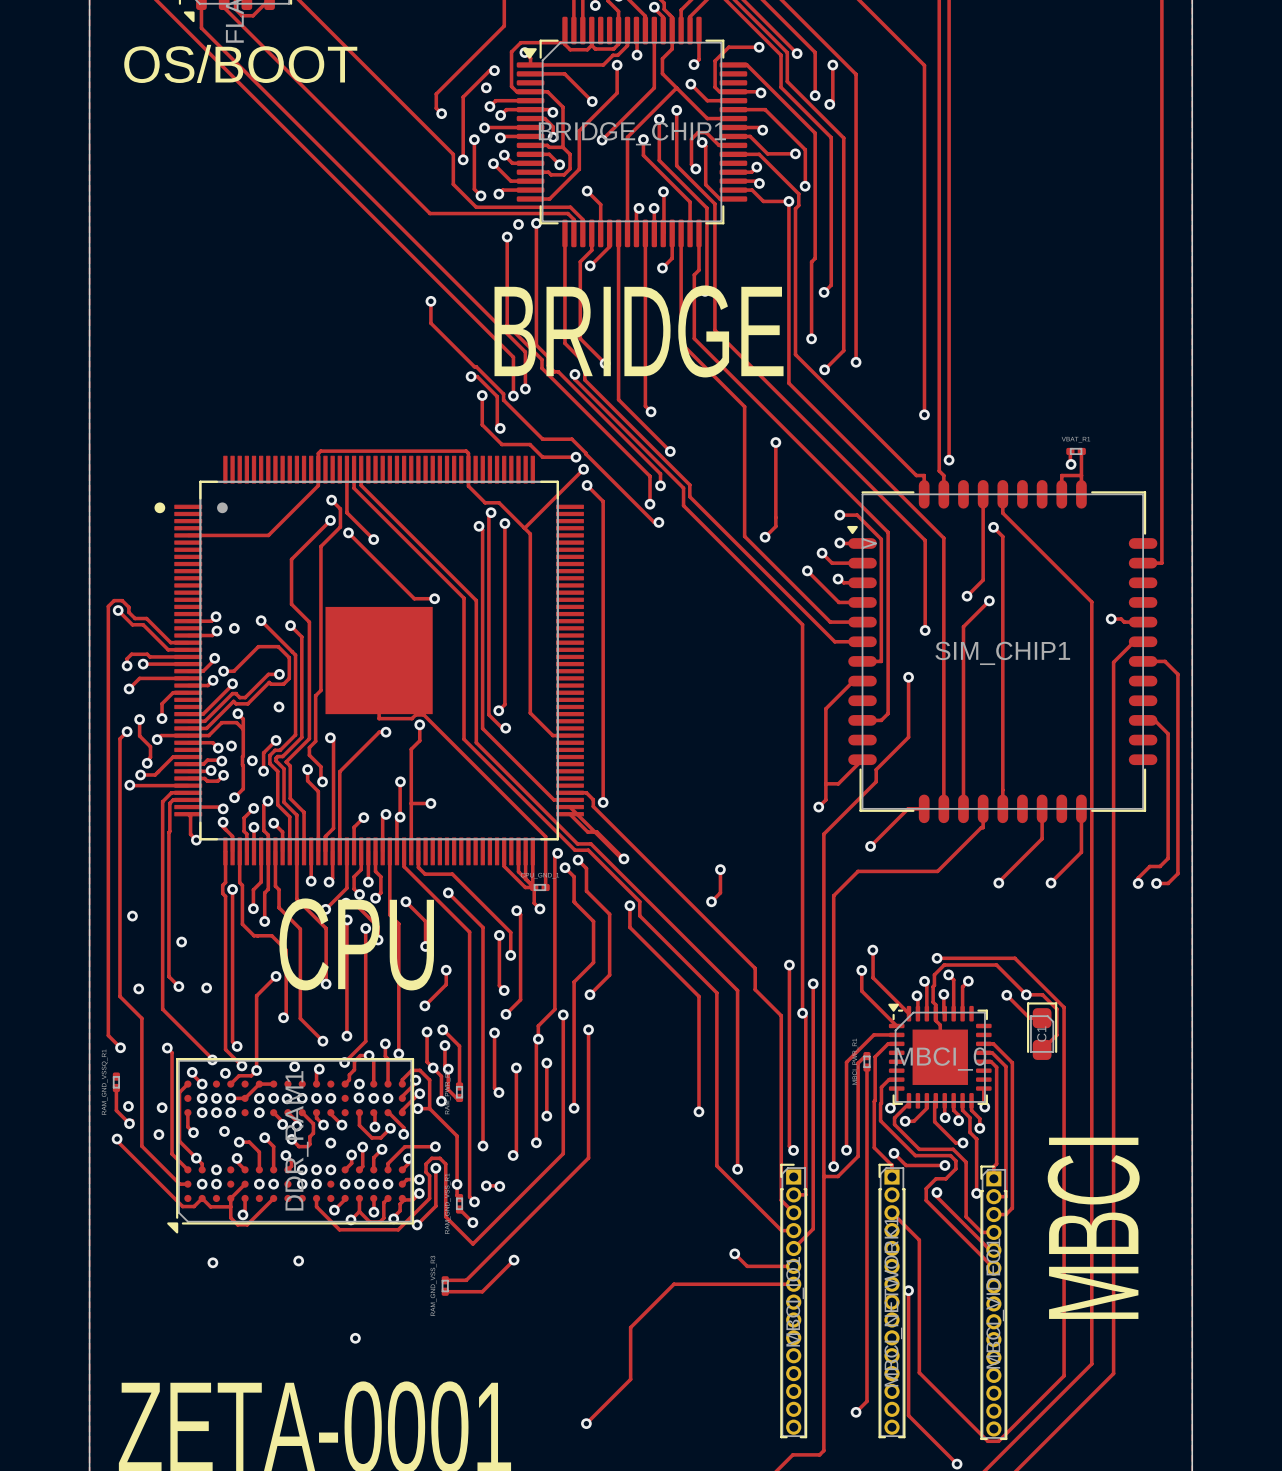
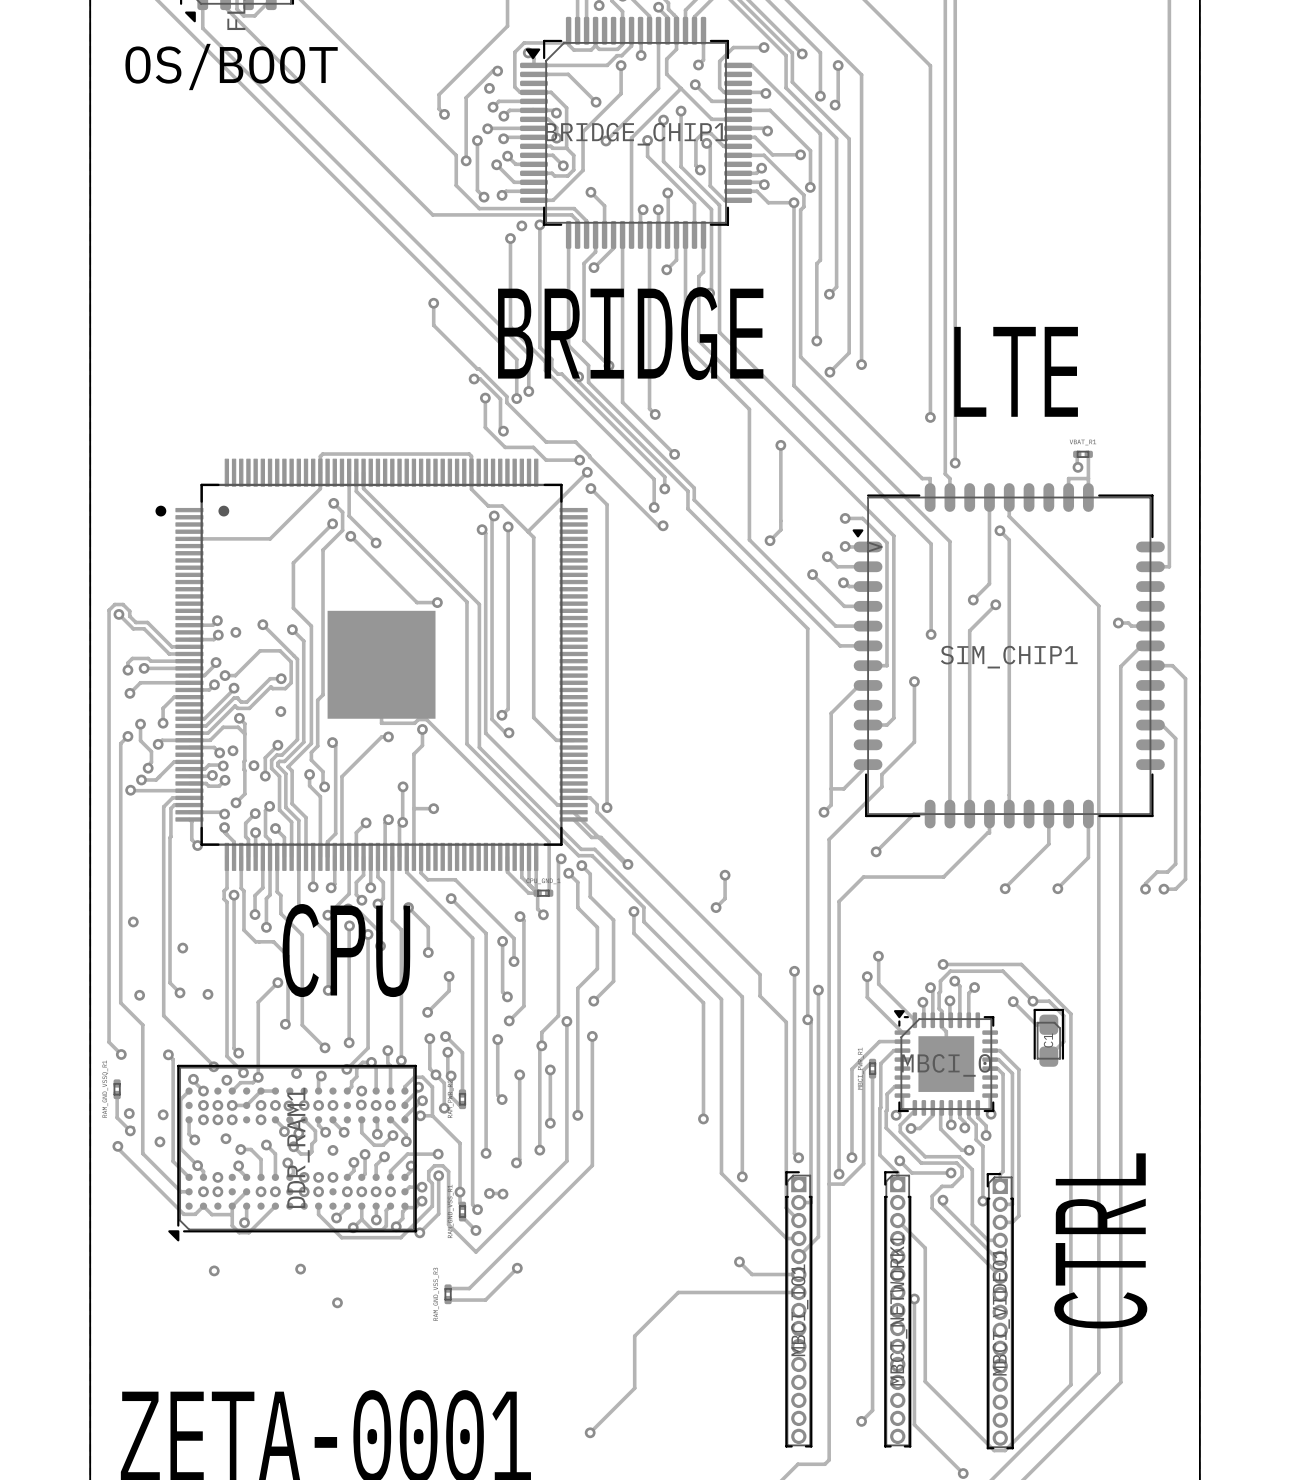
text: none -> LTE (1016, 371)
text: MBCI (1093, 1228) -> CTRL (1100, 1240)
via position: (355, 1338) -> (337, 1302)

